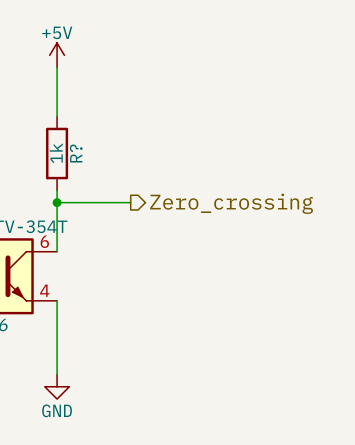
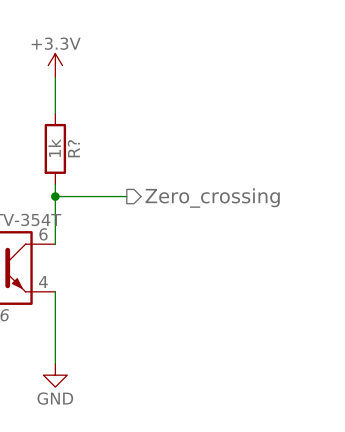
power symbol: +5V (57, 55) -> none
power symbol: none -> +3.3V (55, 65)

